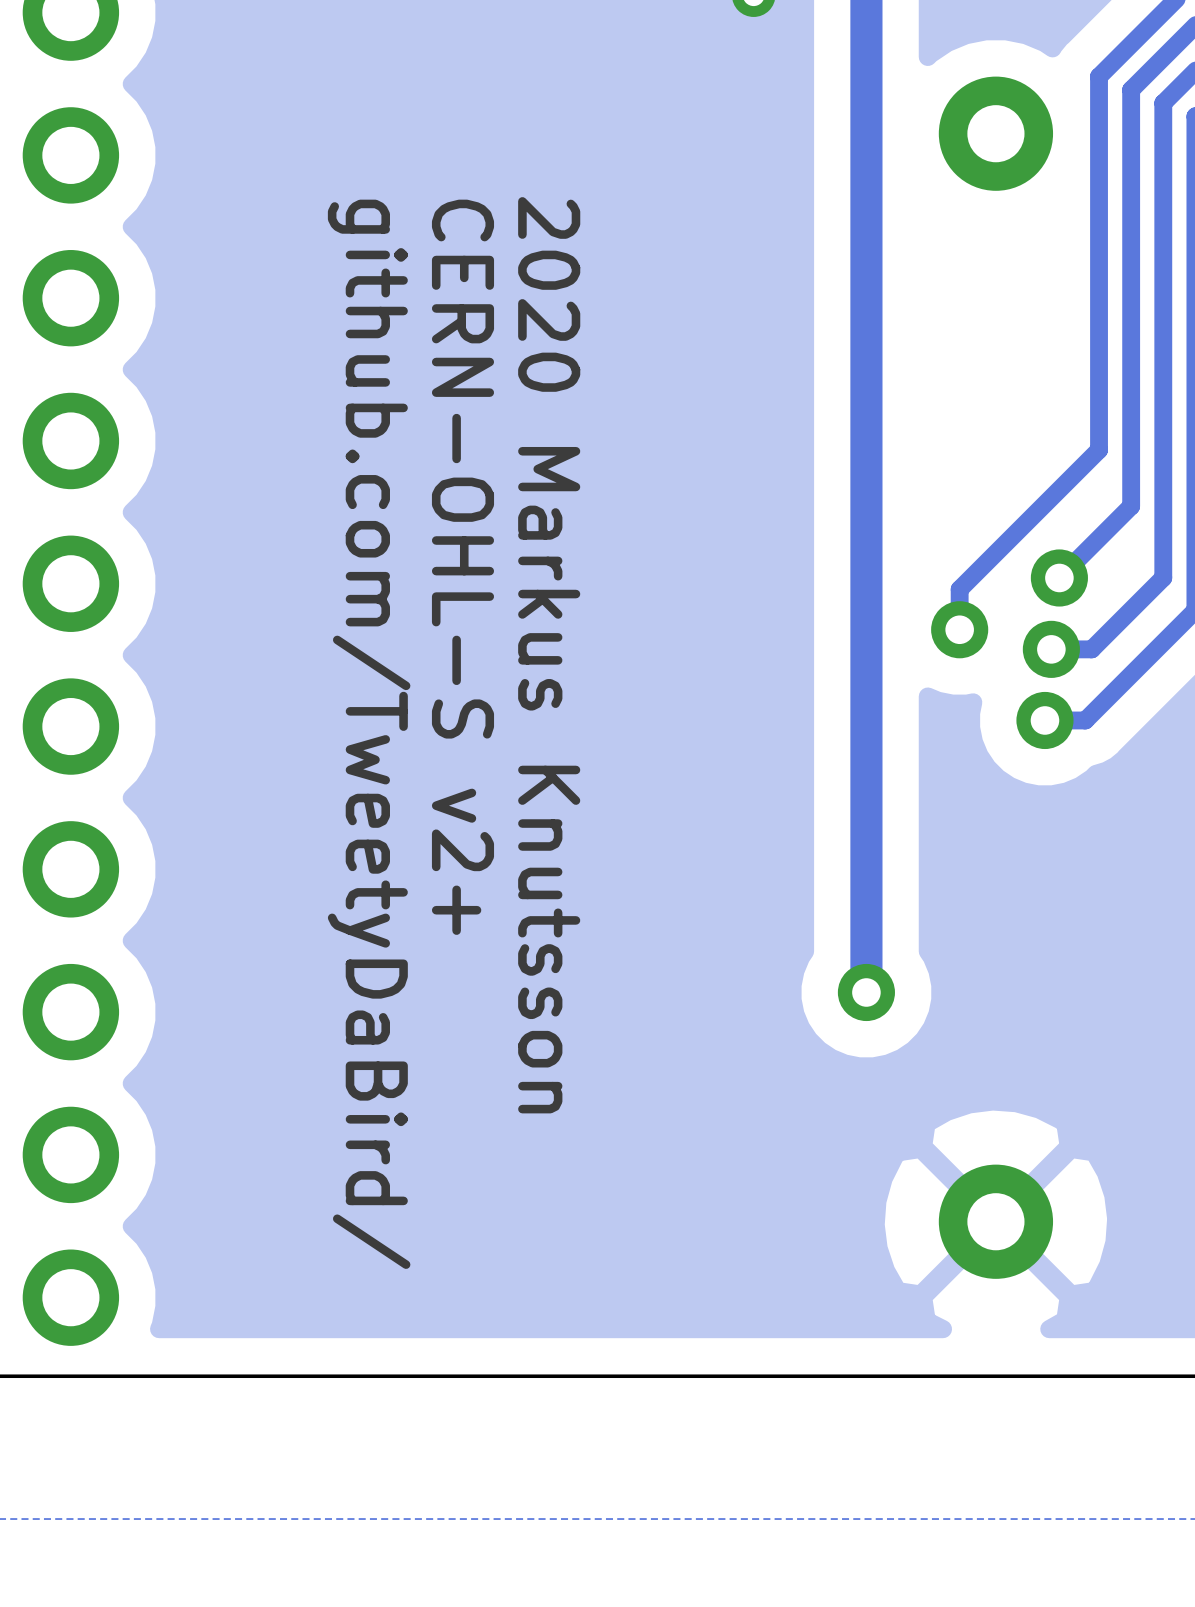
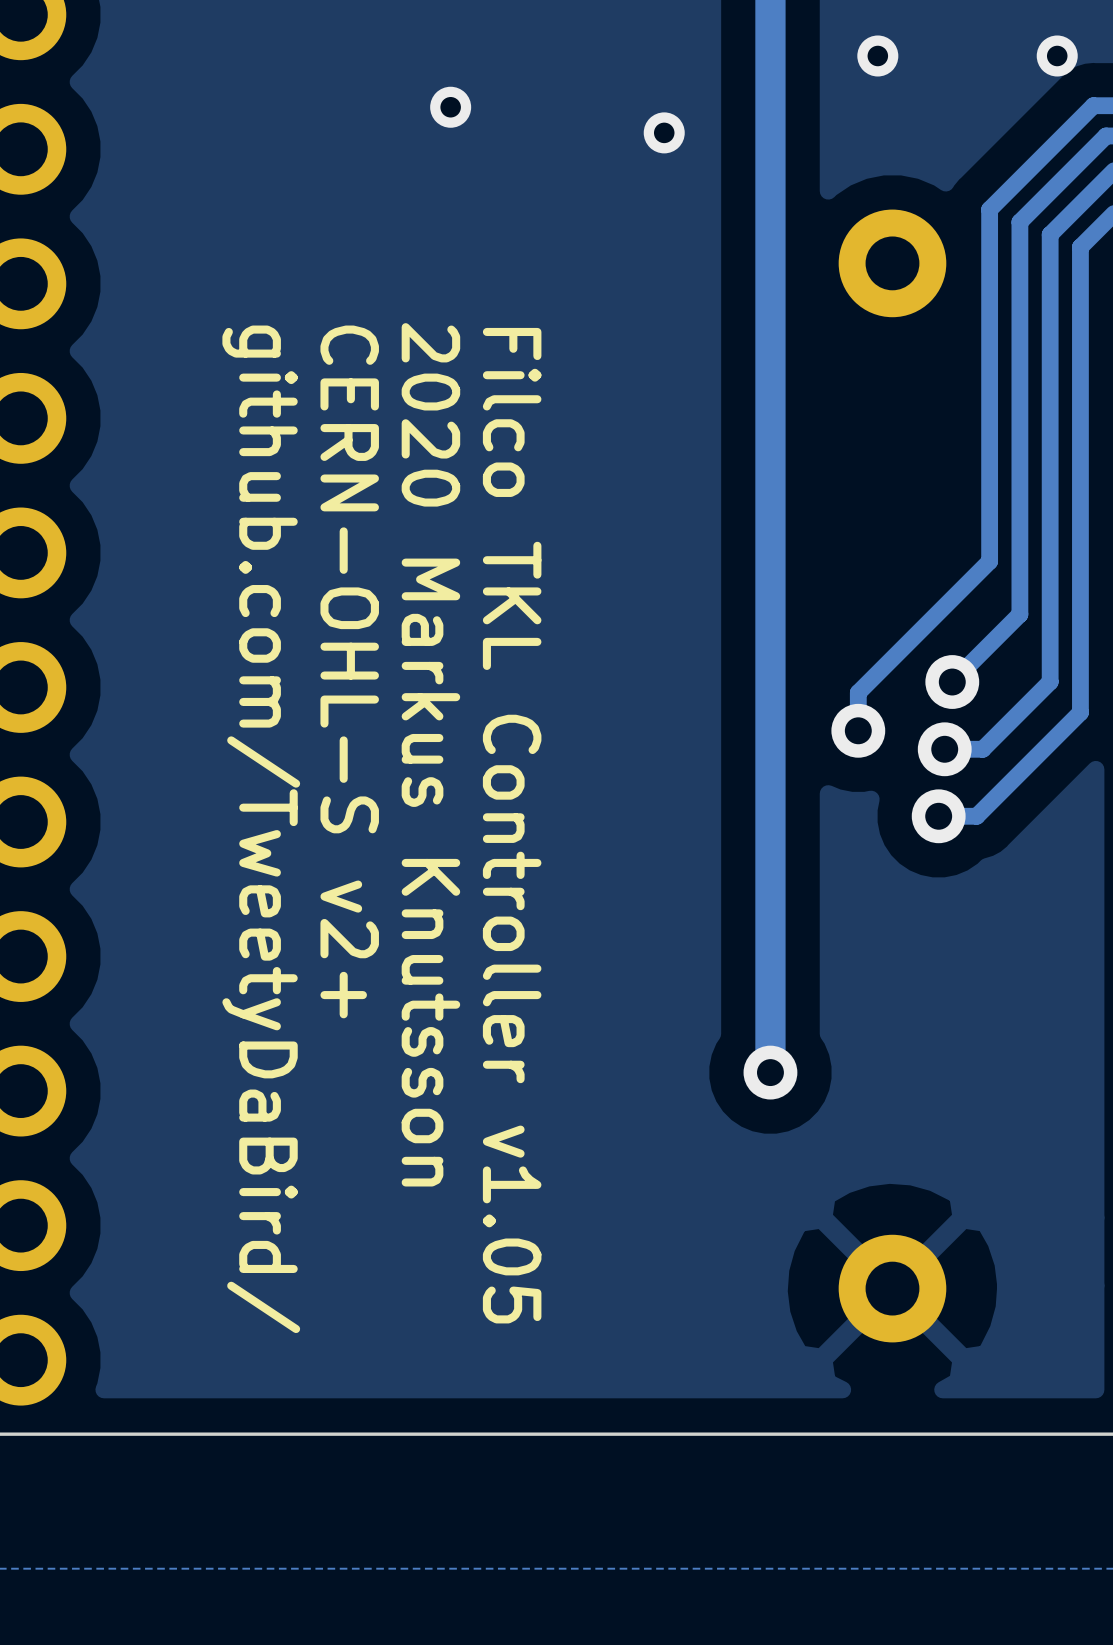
text position: CERN-OHL-S v2+ (462, 567) -> CERN-OHL-S v2+ (349, 671)
text position: 2020 Markus Knutsson (549, 655) -> 2020 Markus Knutsson (430, 754)
text: none -> Filco TKL Controller v1.05 (512, 825)
text position: github.com/TweetyDaBird/ (369, 734) -> github.com/TweetyDaBird/ (261, 829)

